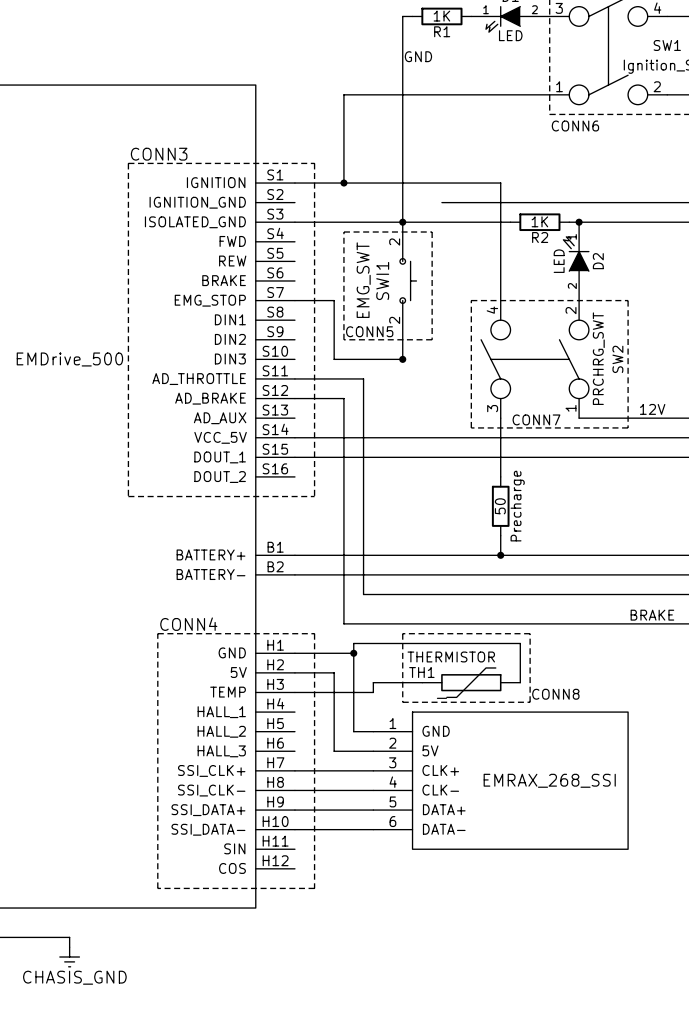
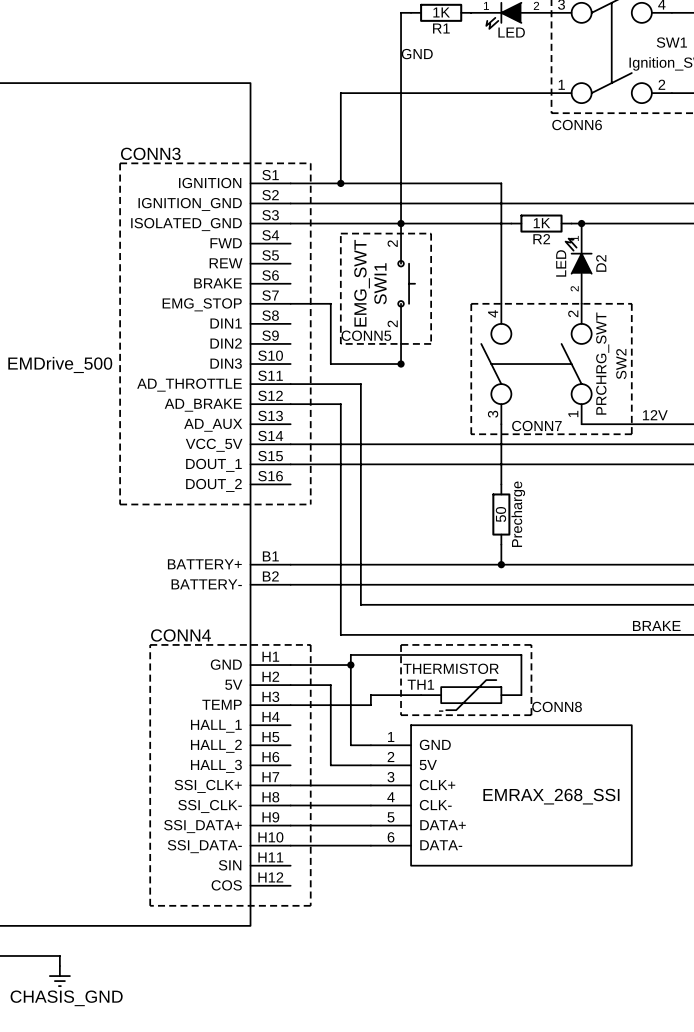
wire: none -> (290, 203) (441, 203)

